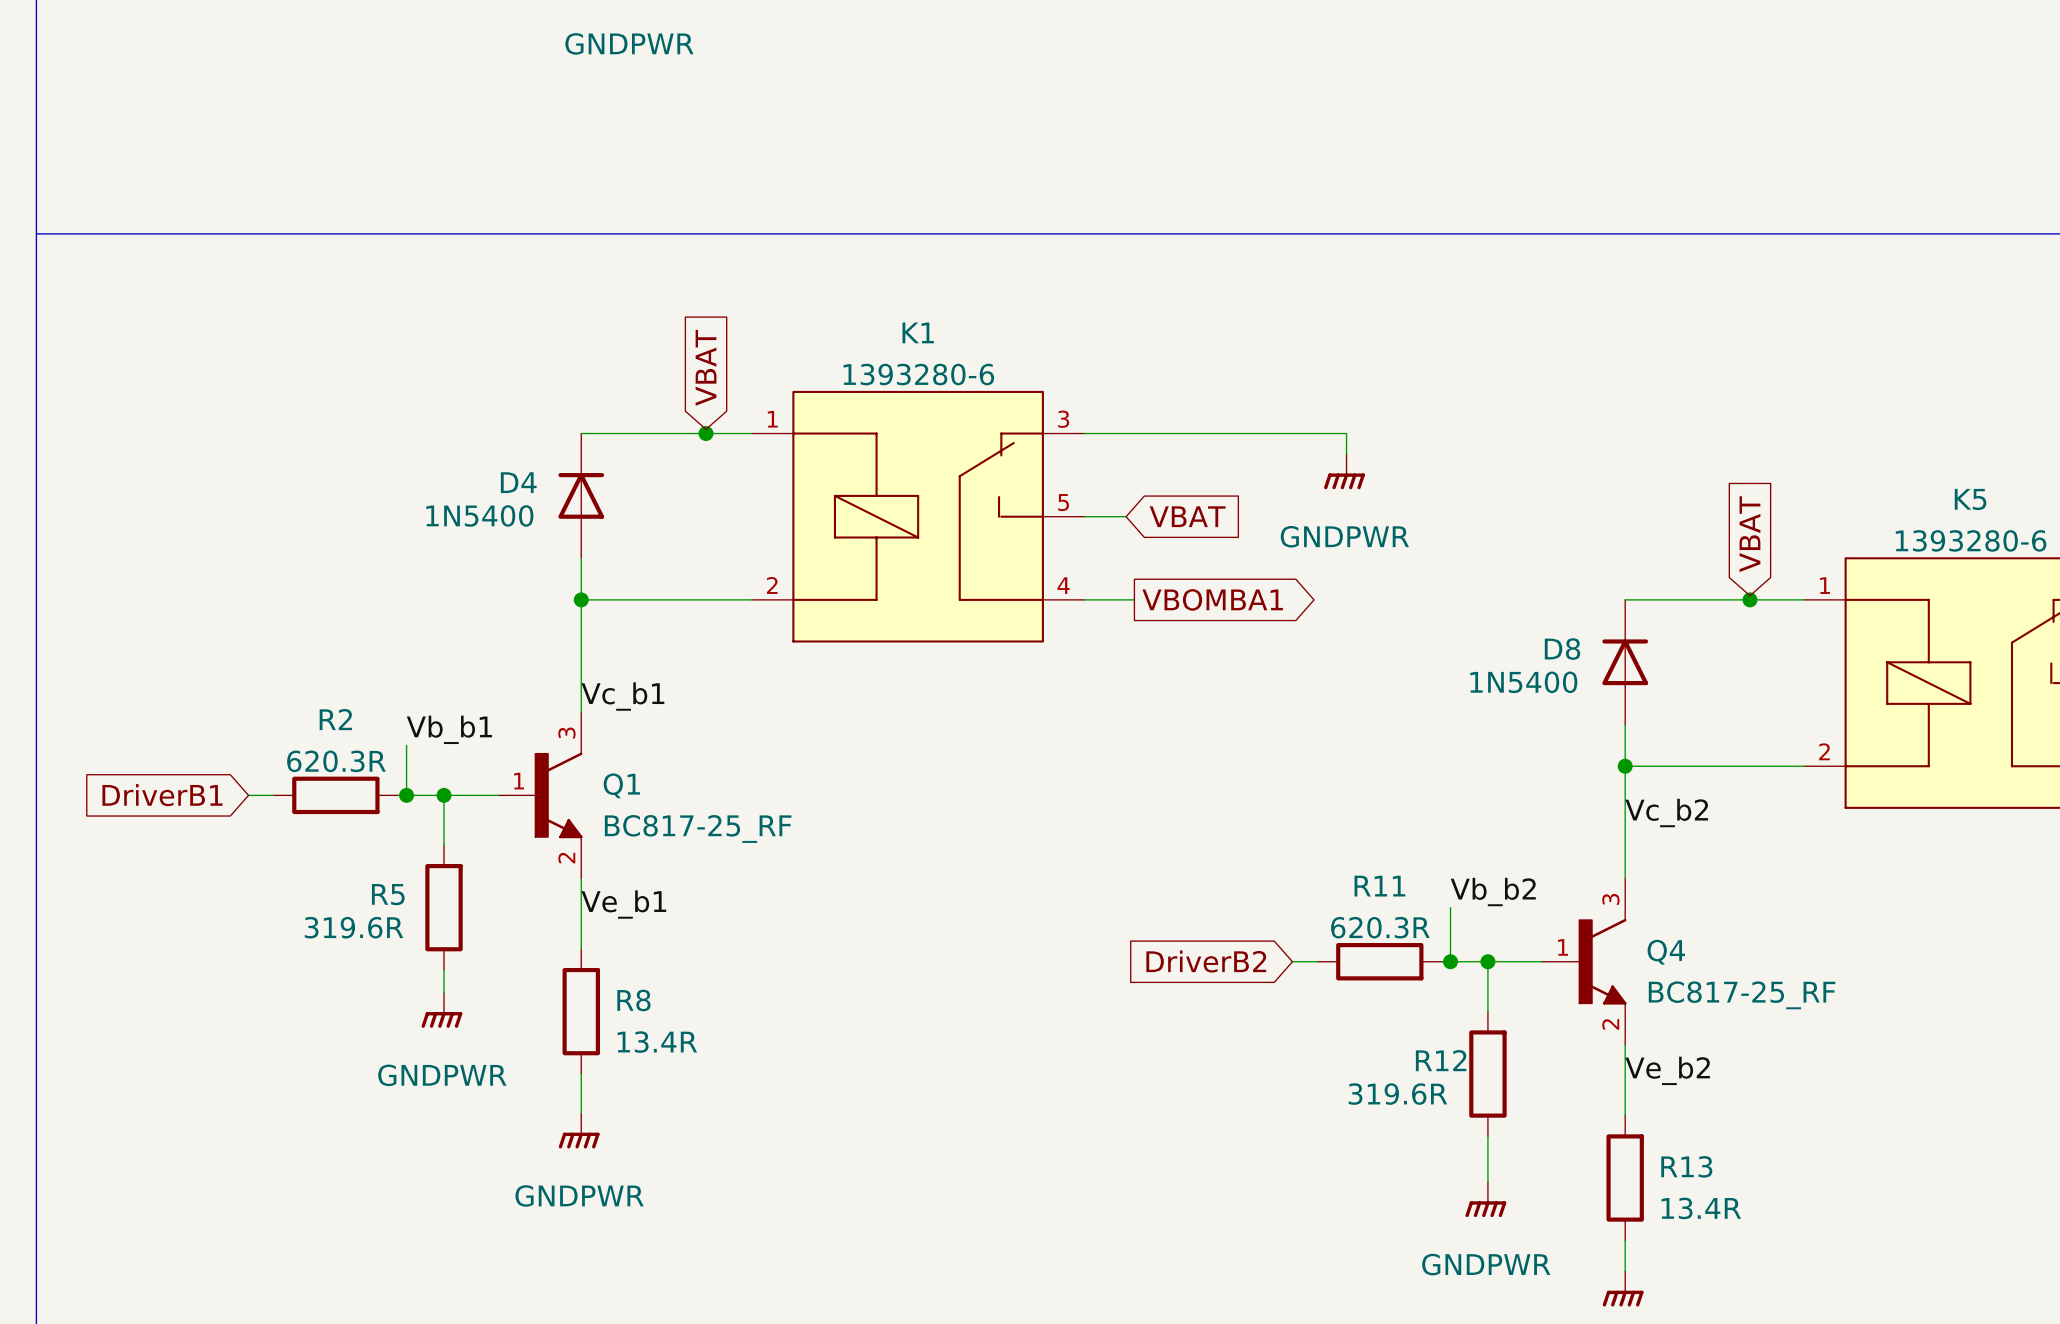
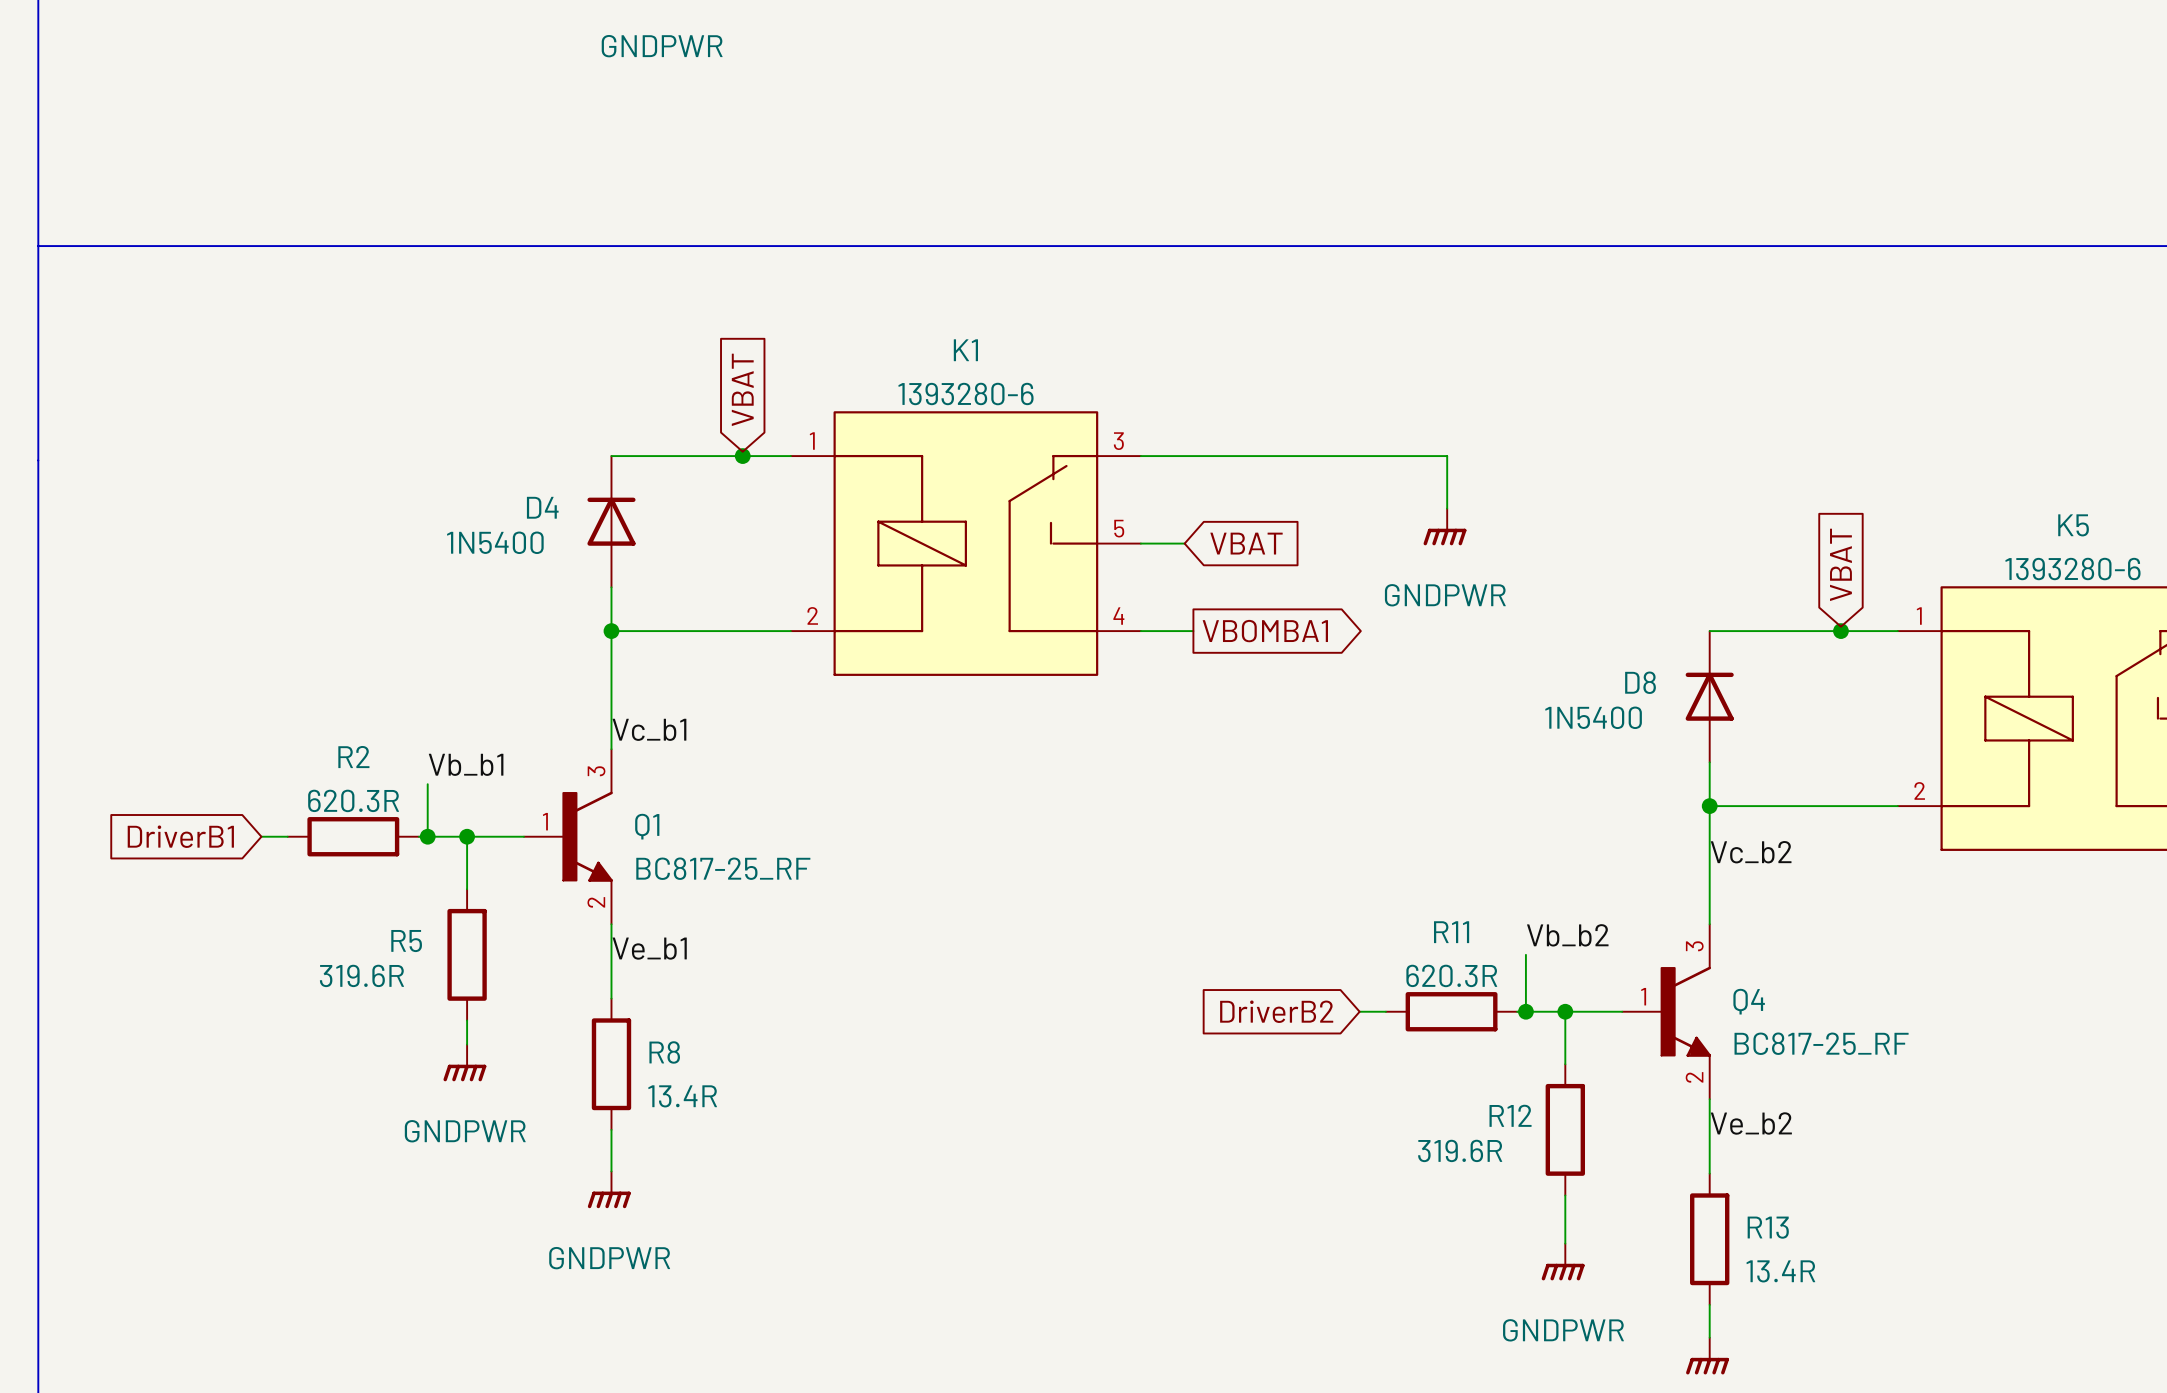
wire: (1346, 433) (1346, 454) -> (1416, 456) (1447, 456) (1447, 508)
power symbol position: GNDPWR (1344, 471) -> GNDPWR (1444, 526)

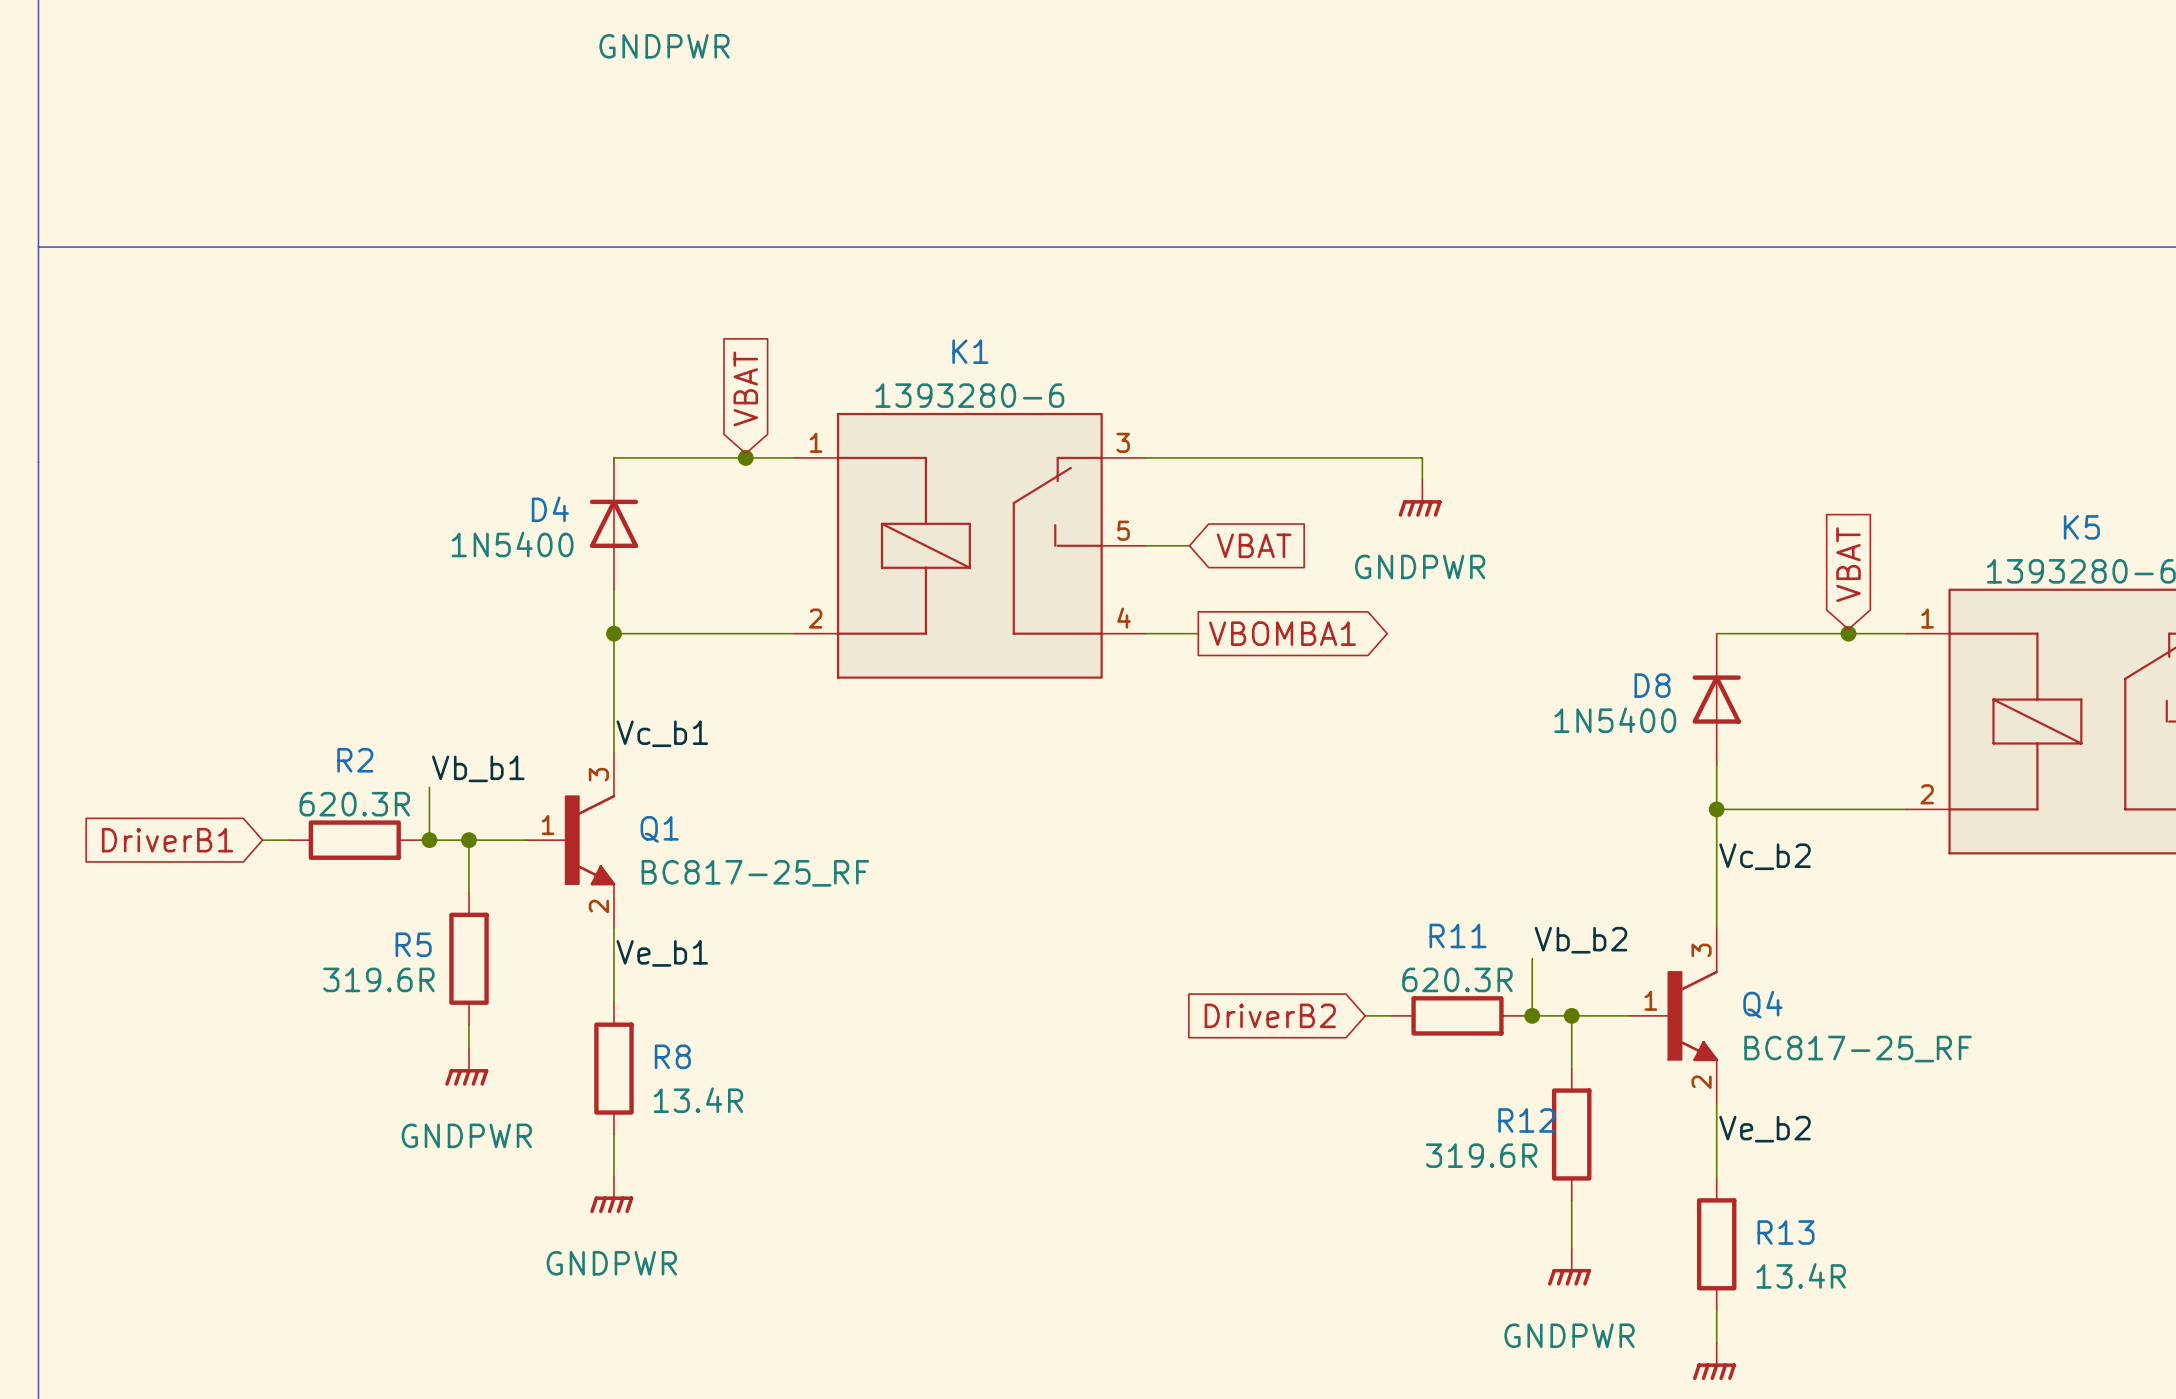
wire: (1416, 456) (1447, 456) (1447, 508) -> (1422, 457) (1422, 479)
power symbol position: GNDPWR (1444, 526) -> GNDPWR (1420, 498)

